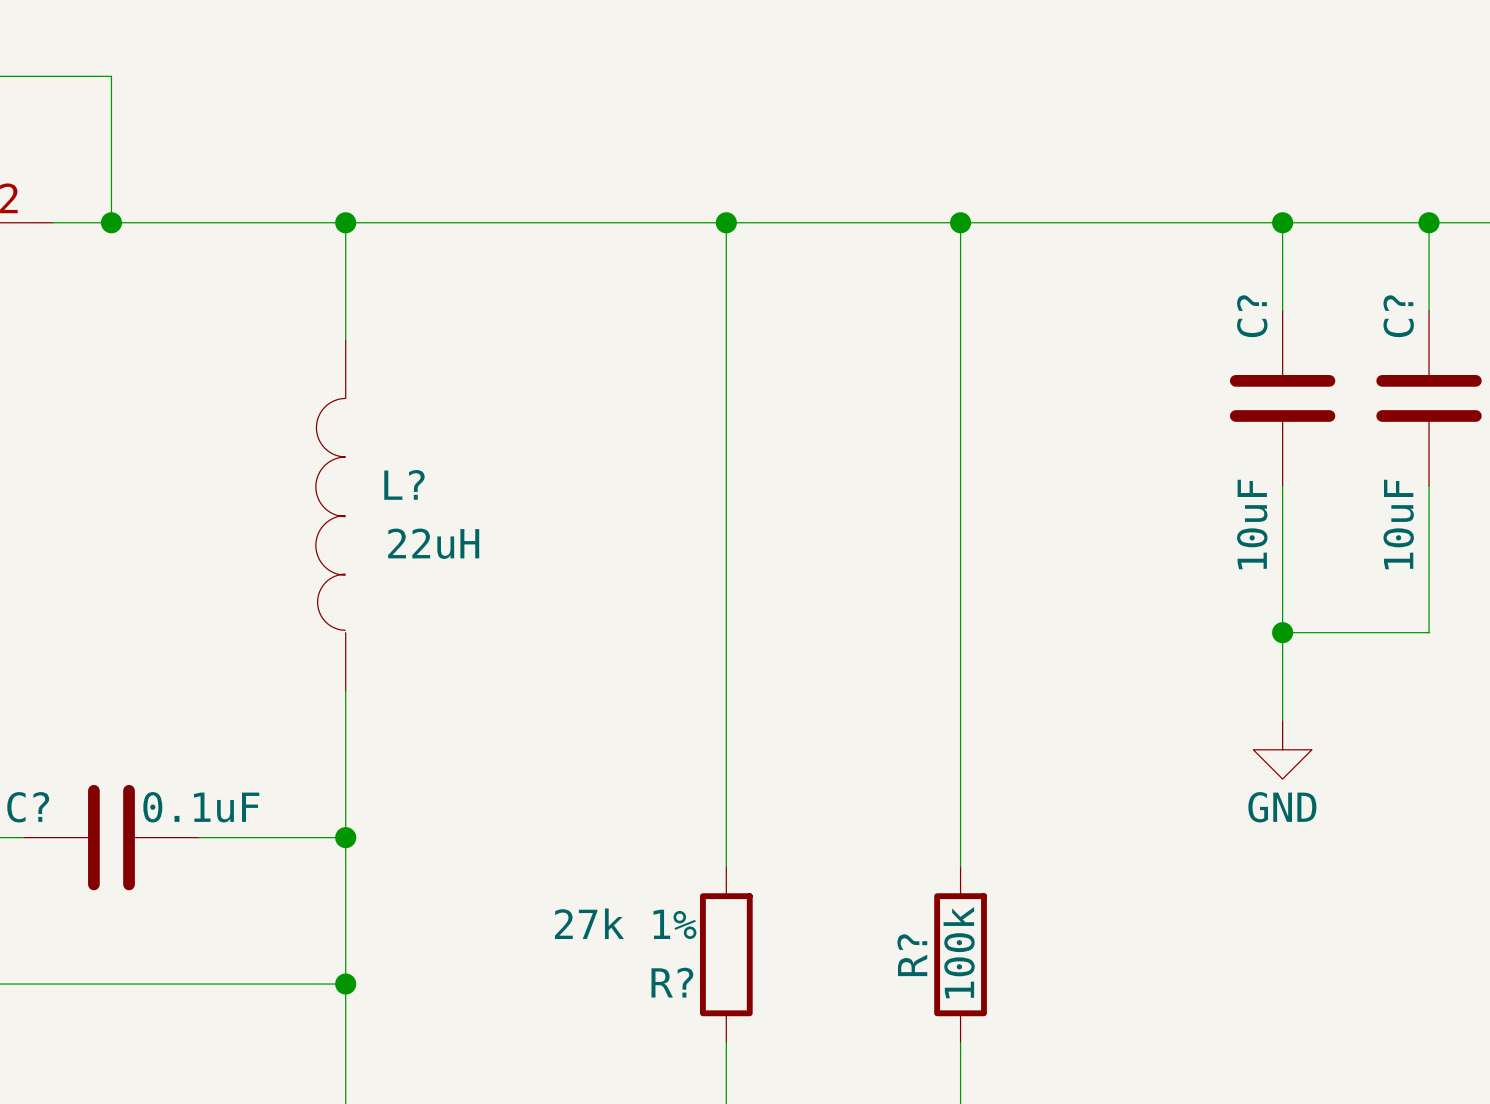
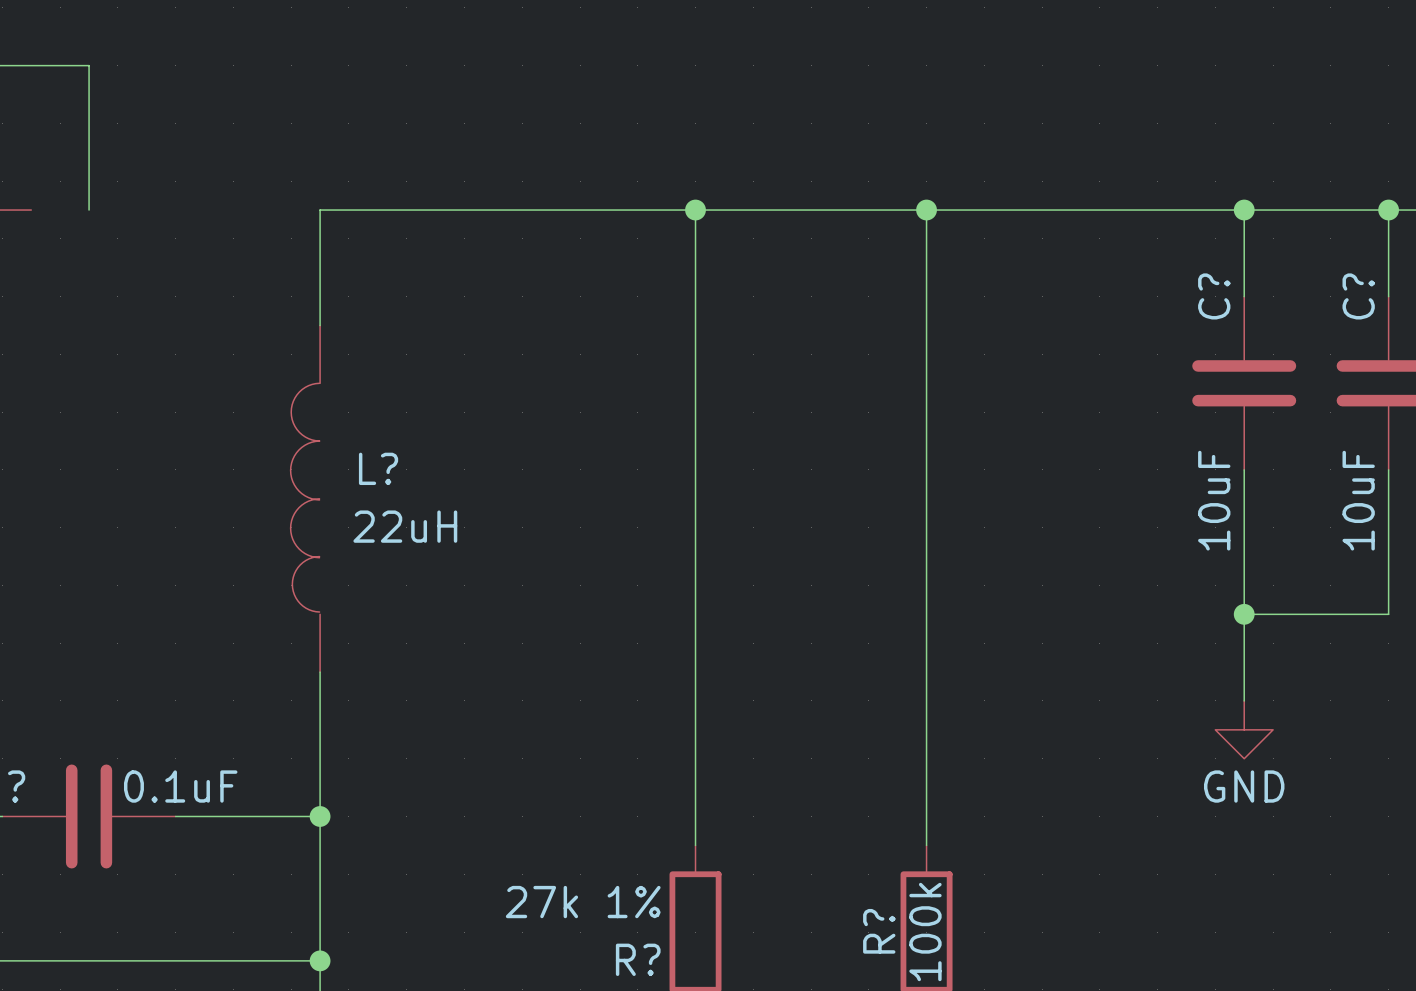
wire: (52, 222) (345, 222) -> none
junction: (111, 222) -> none
junction: (345, 222) -> none

